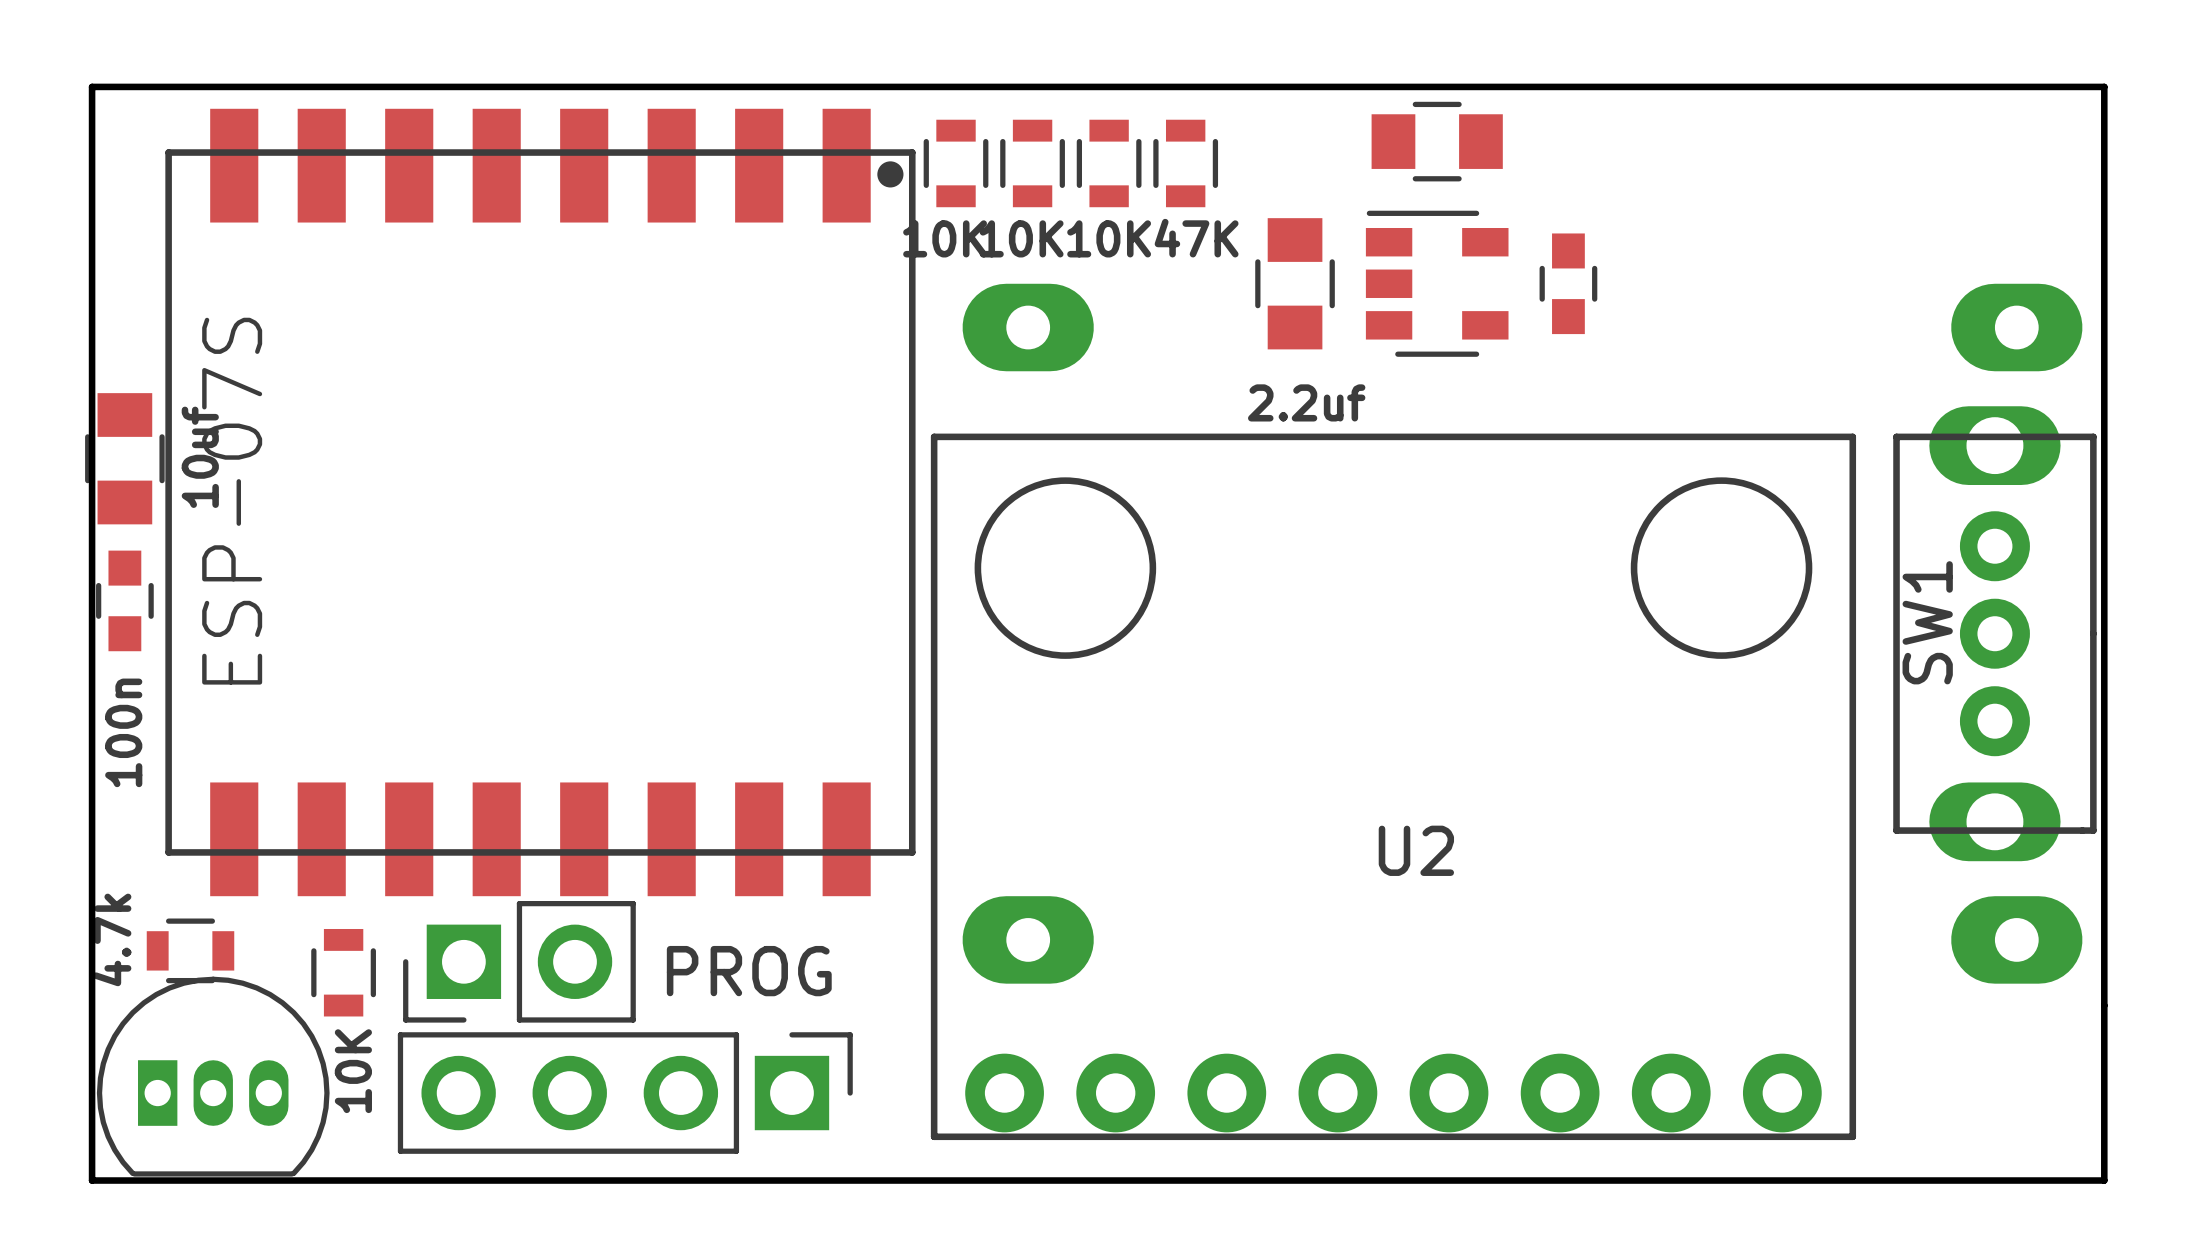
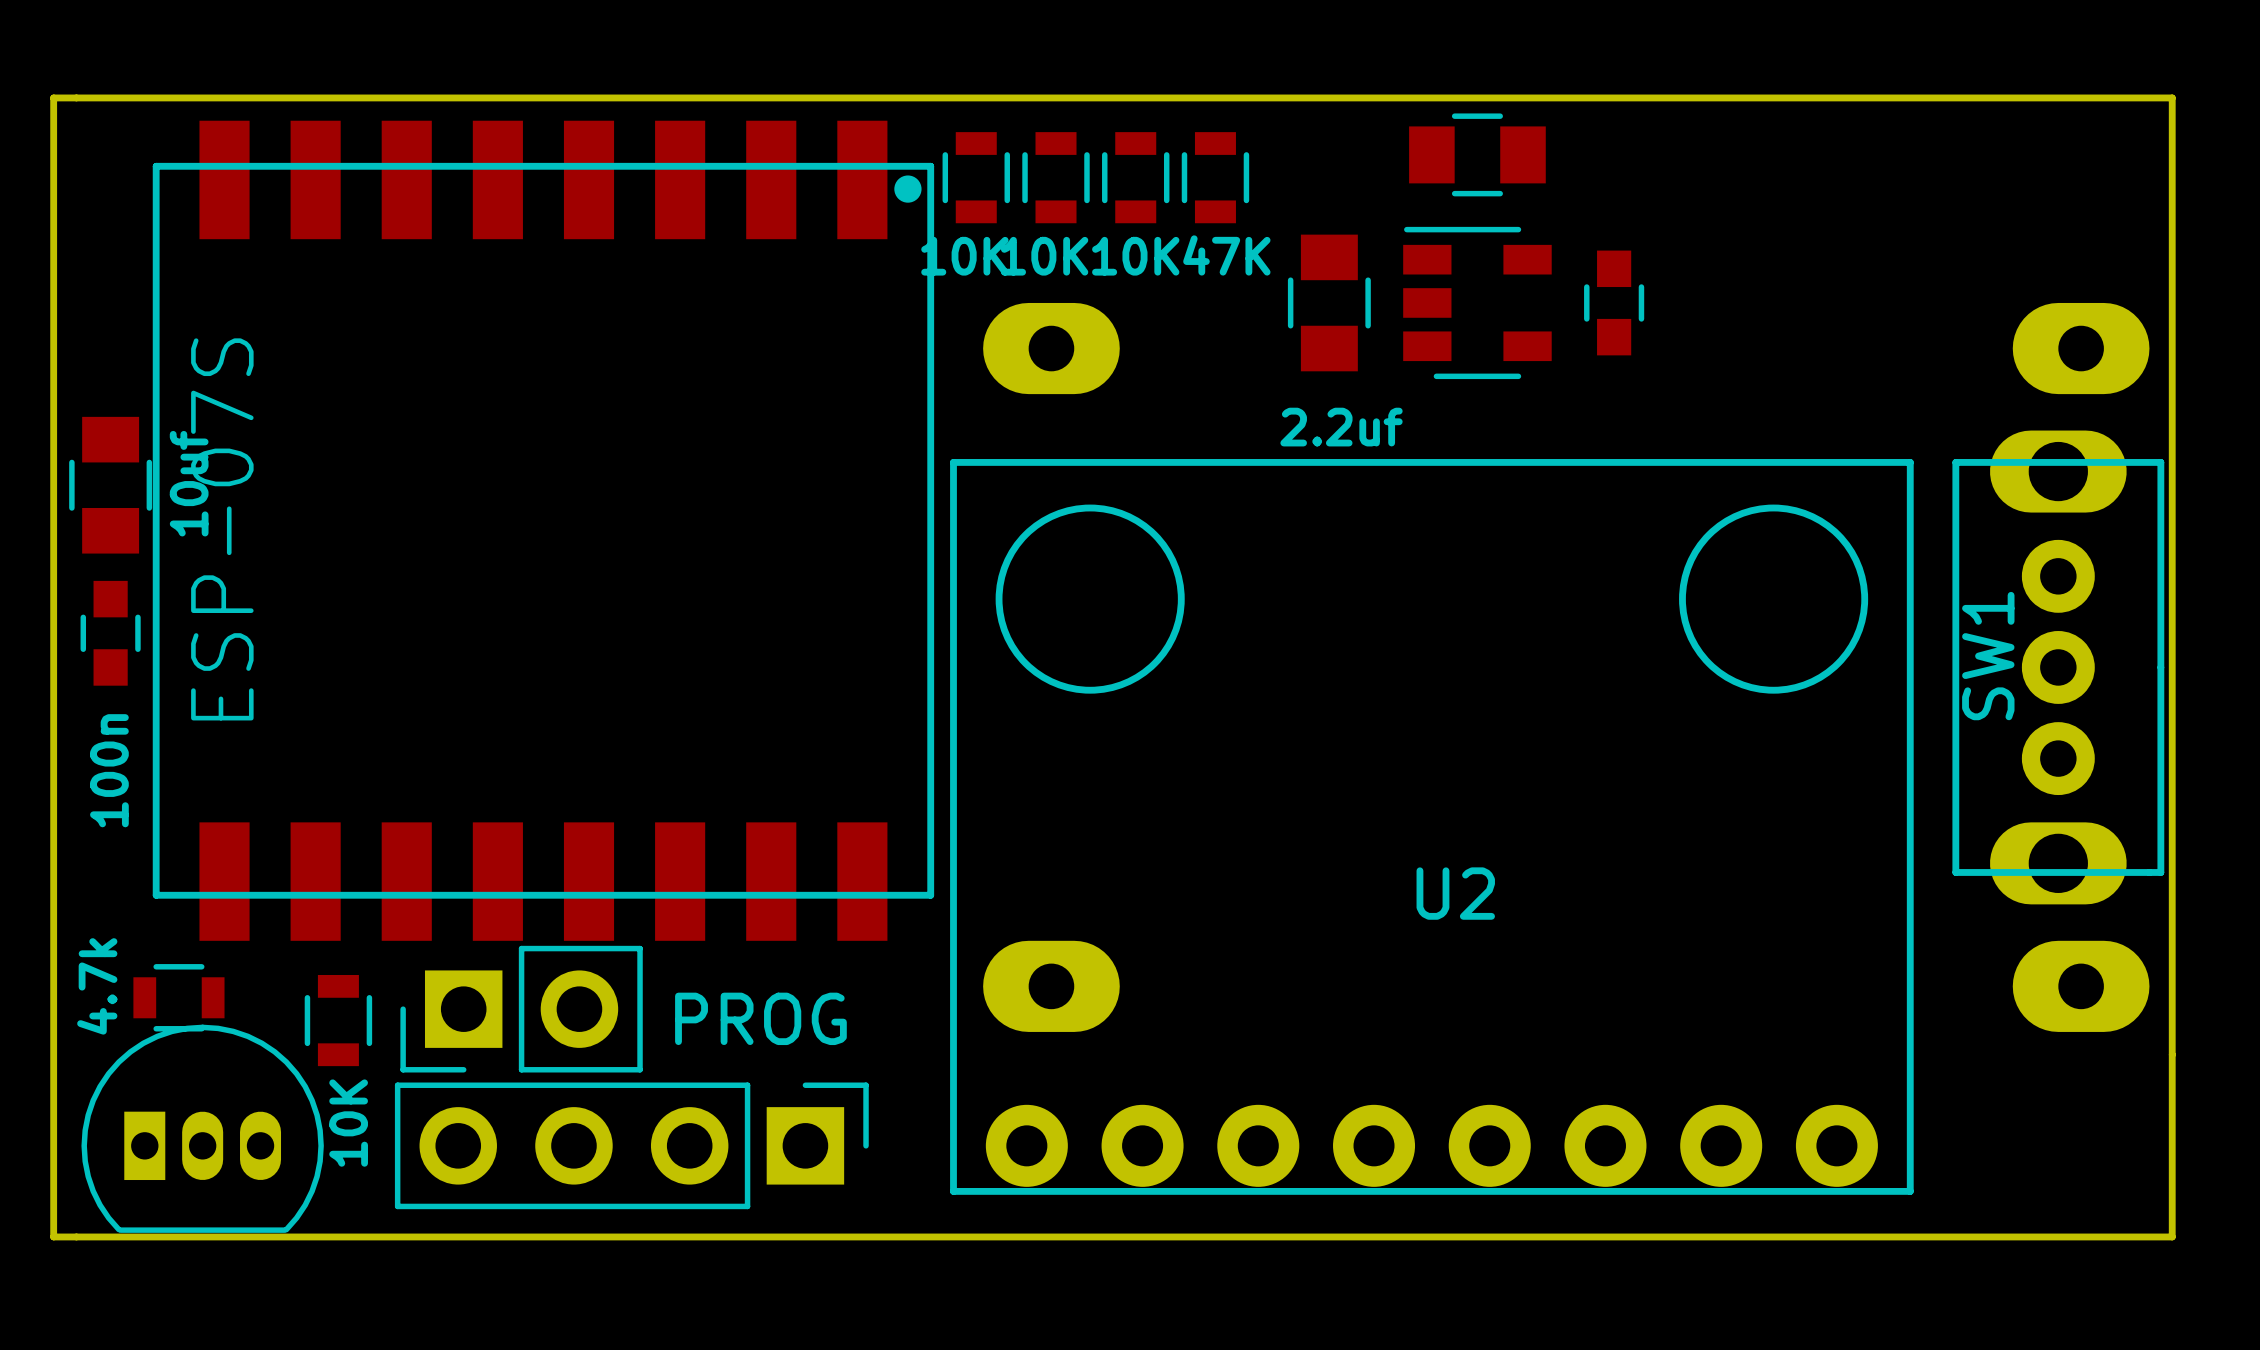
board edge: (92, 86) (92, 1180) -> (76, 97) (53, 97) (53, 1236) (76, 1236)

